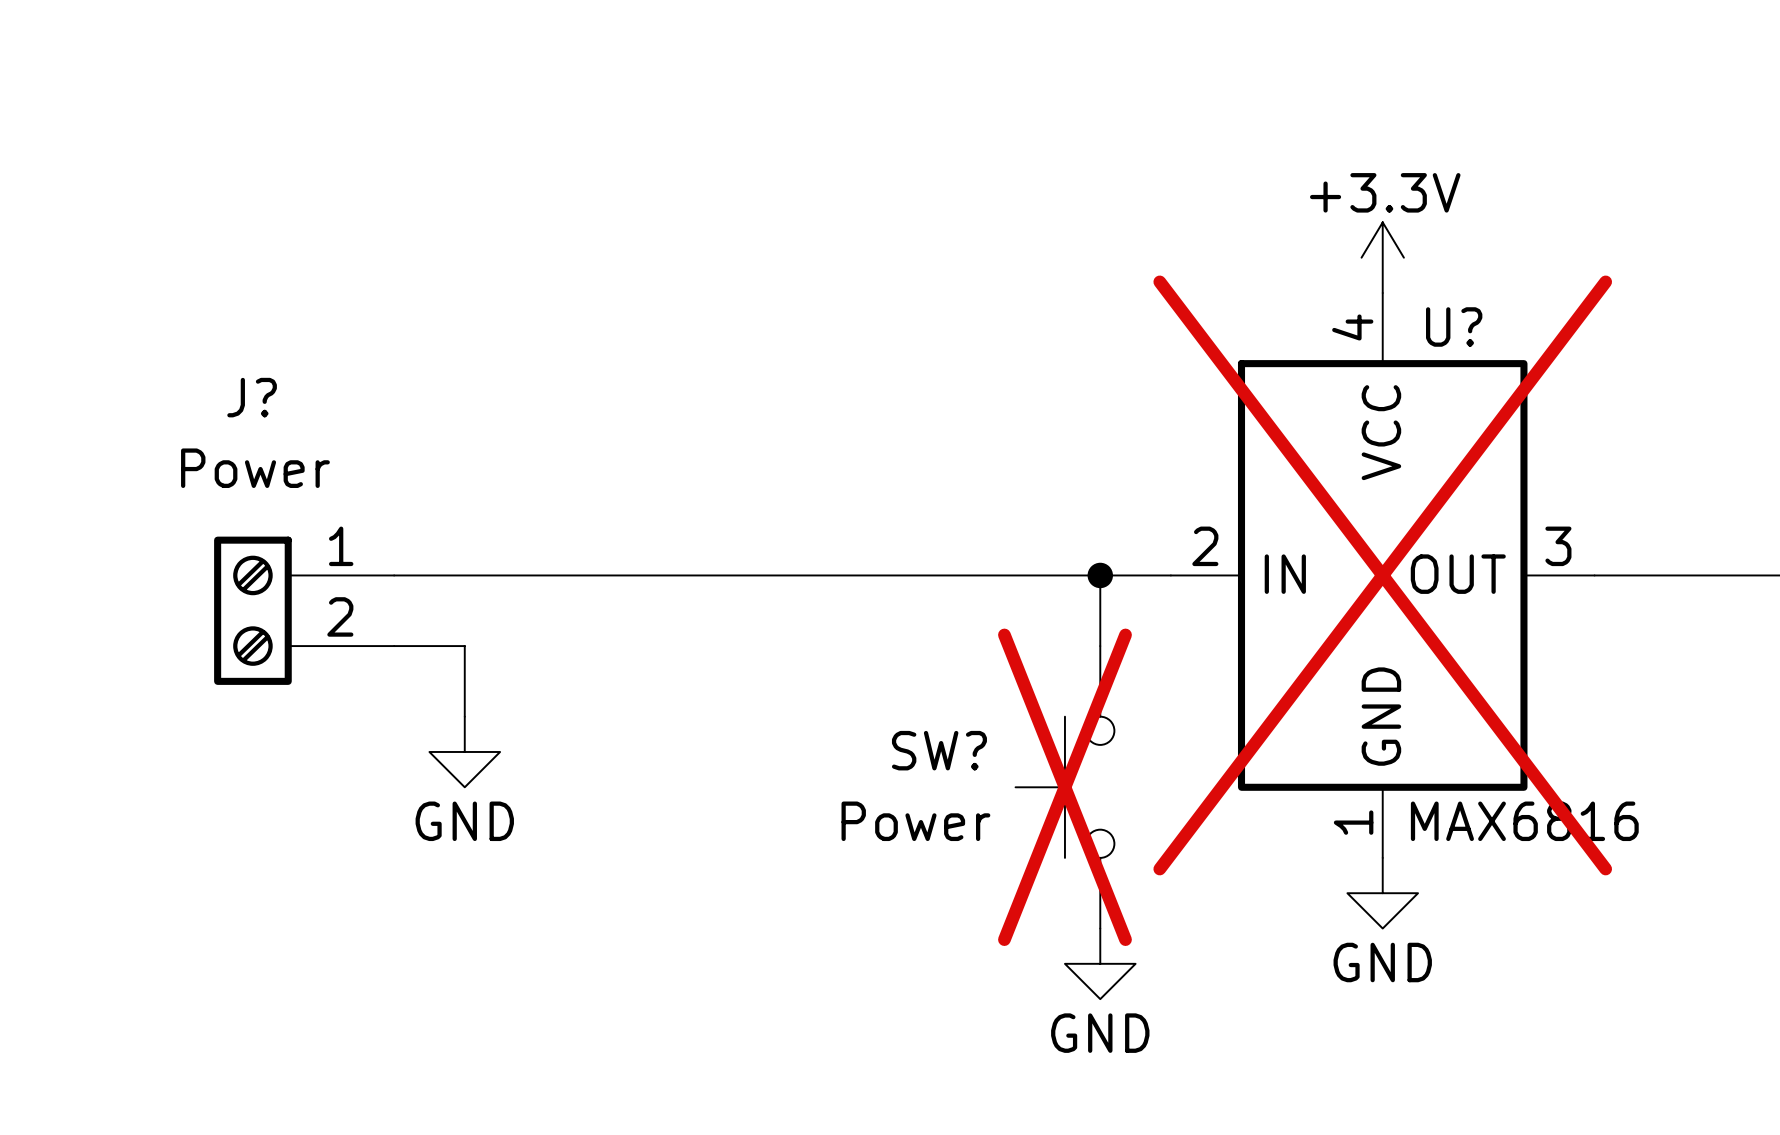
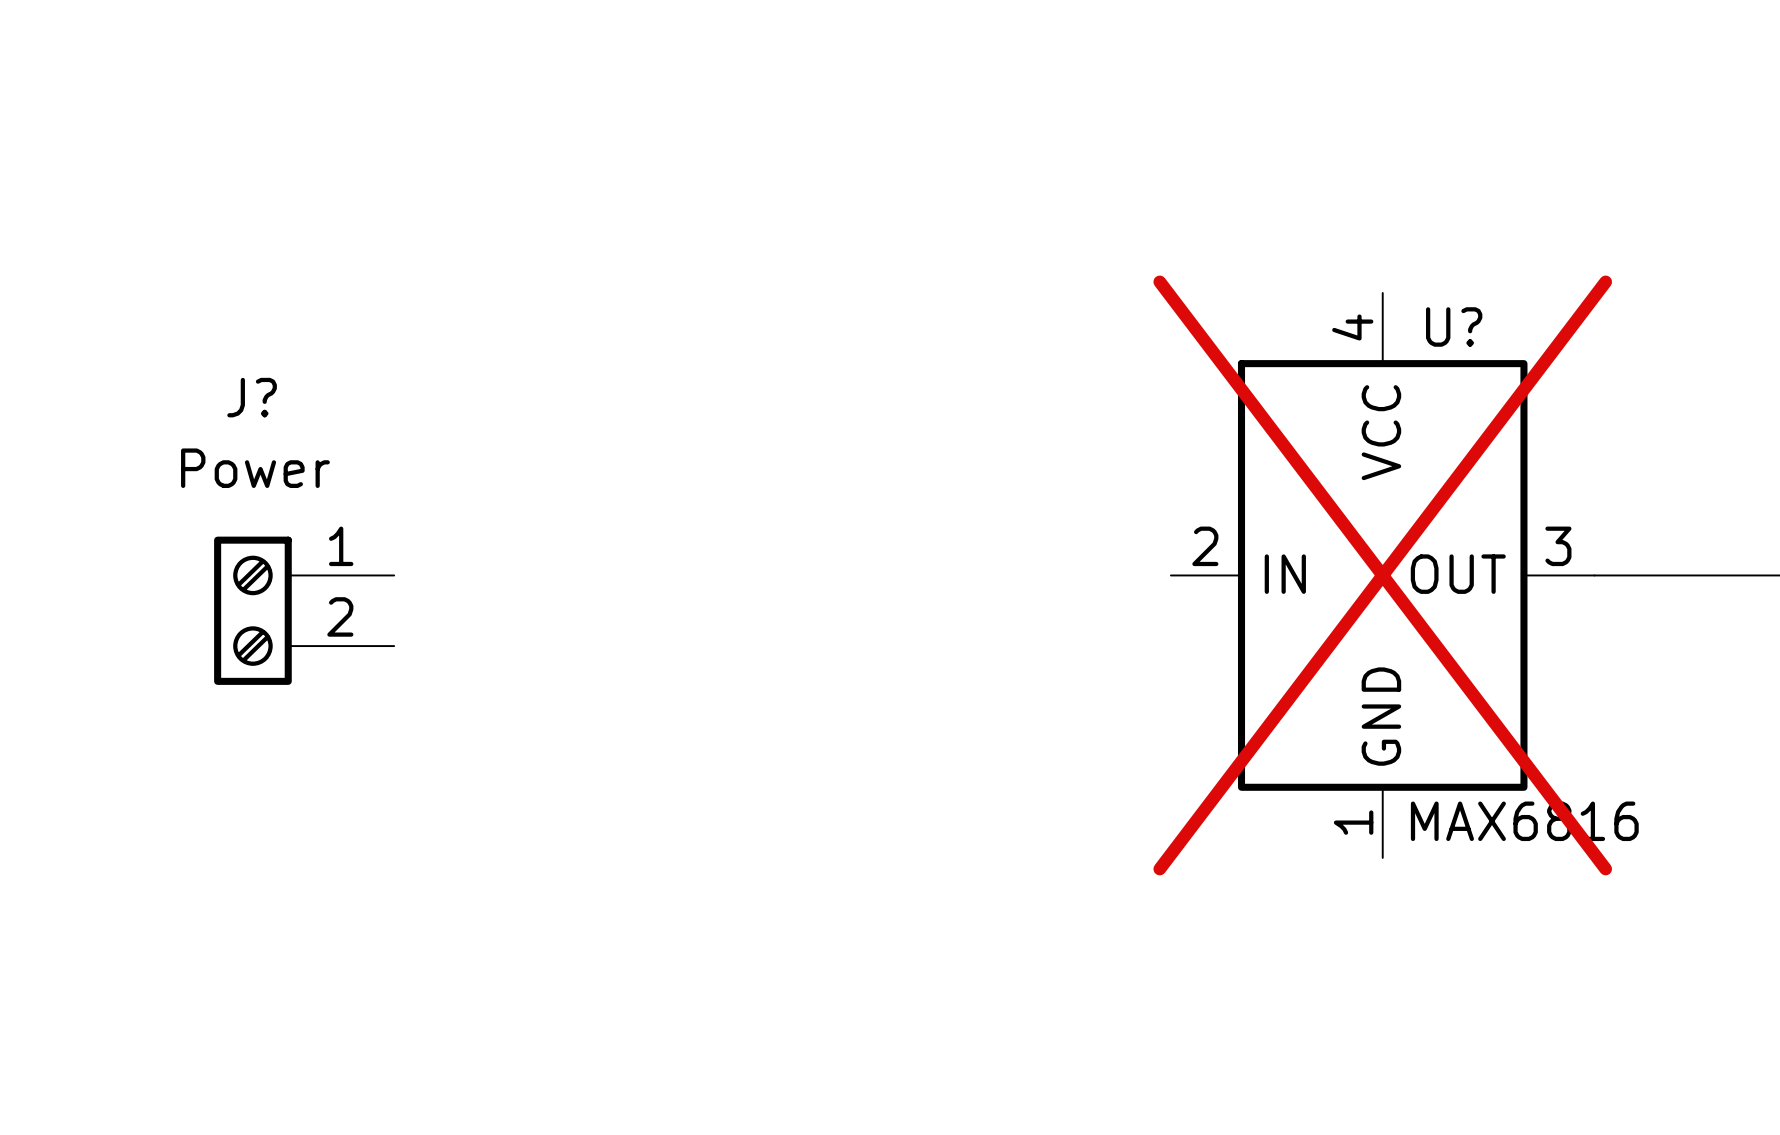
power symbol: +3.3V (1382, 257) -> none
wire: (394, 575) (1170, 575) -> none
wire: (1100, 575) (1100, 646) -> none
junction: (1100, 575) -> none
wire: (394, 646) (464, 646) (464, 716) -> none
power symbol: GND (464, 751) -> none
SW?: Power (1064, 787) -> none
power symbol: GND (1382, 893) -> none
power symbol: GND (1100, 963) -> none

